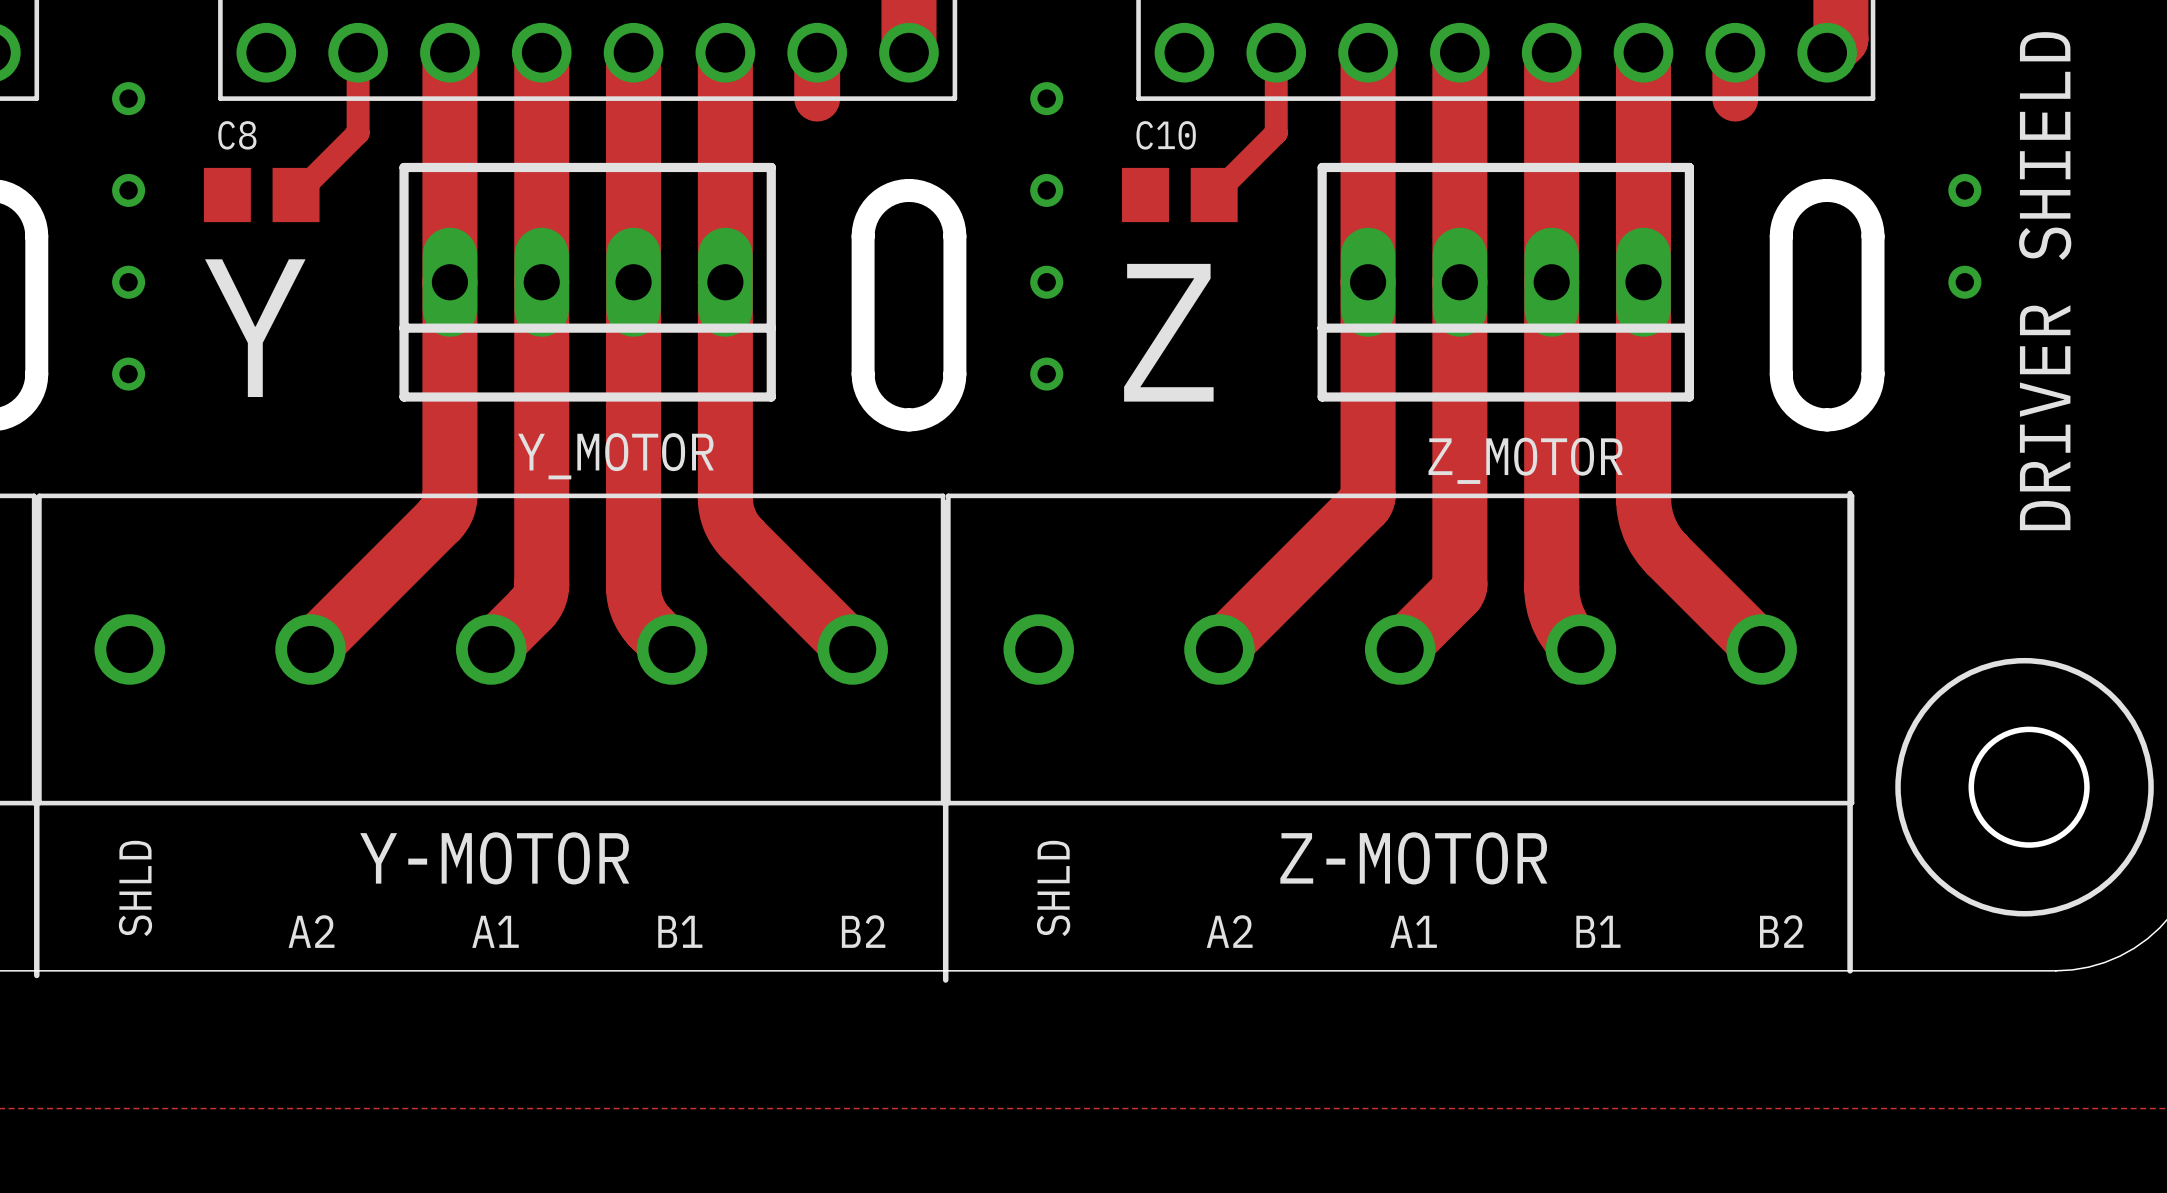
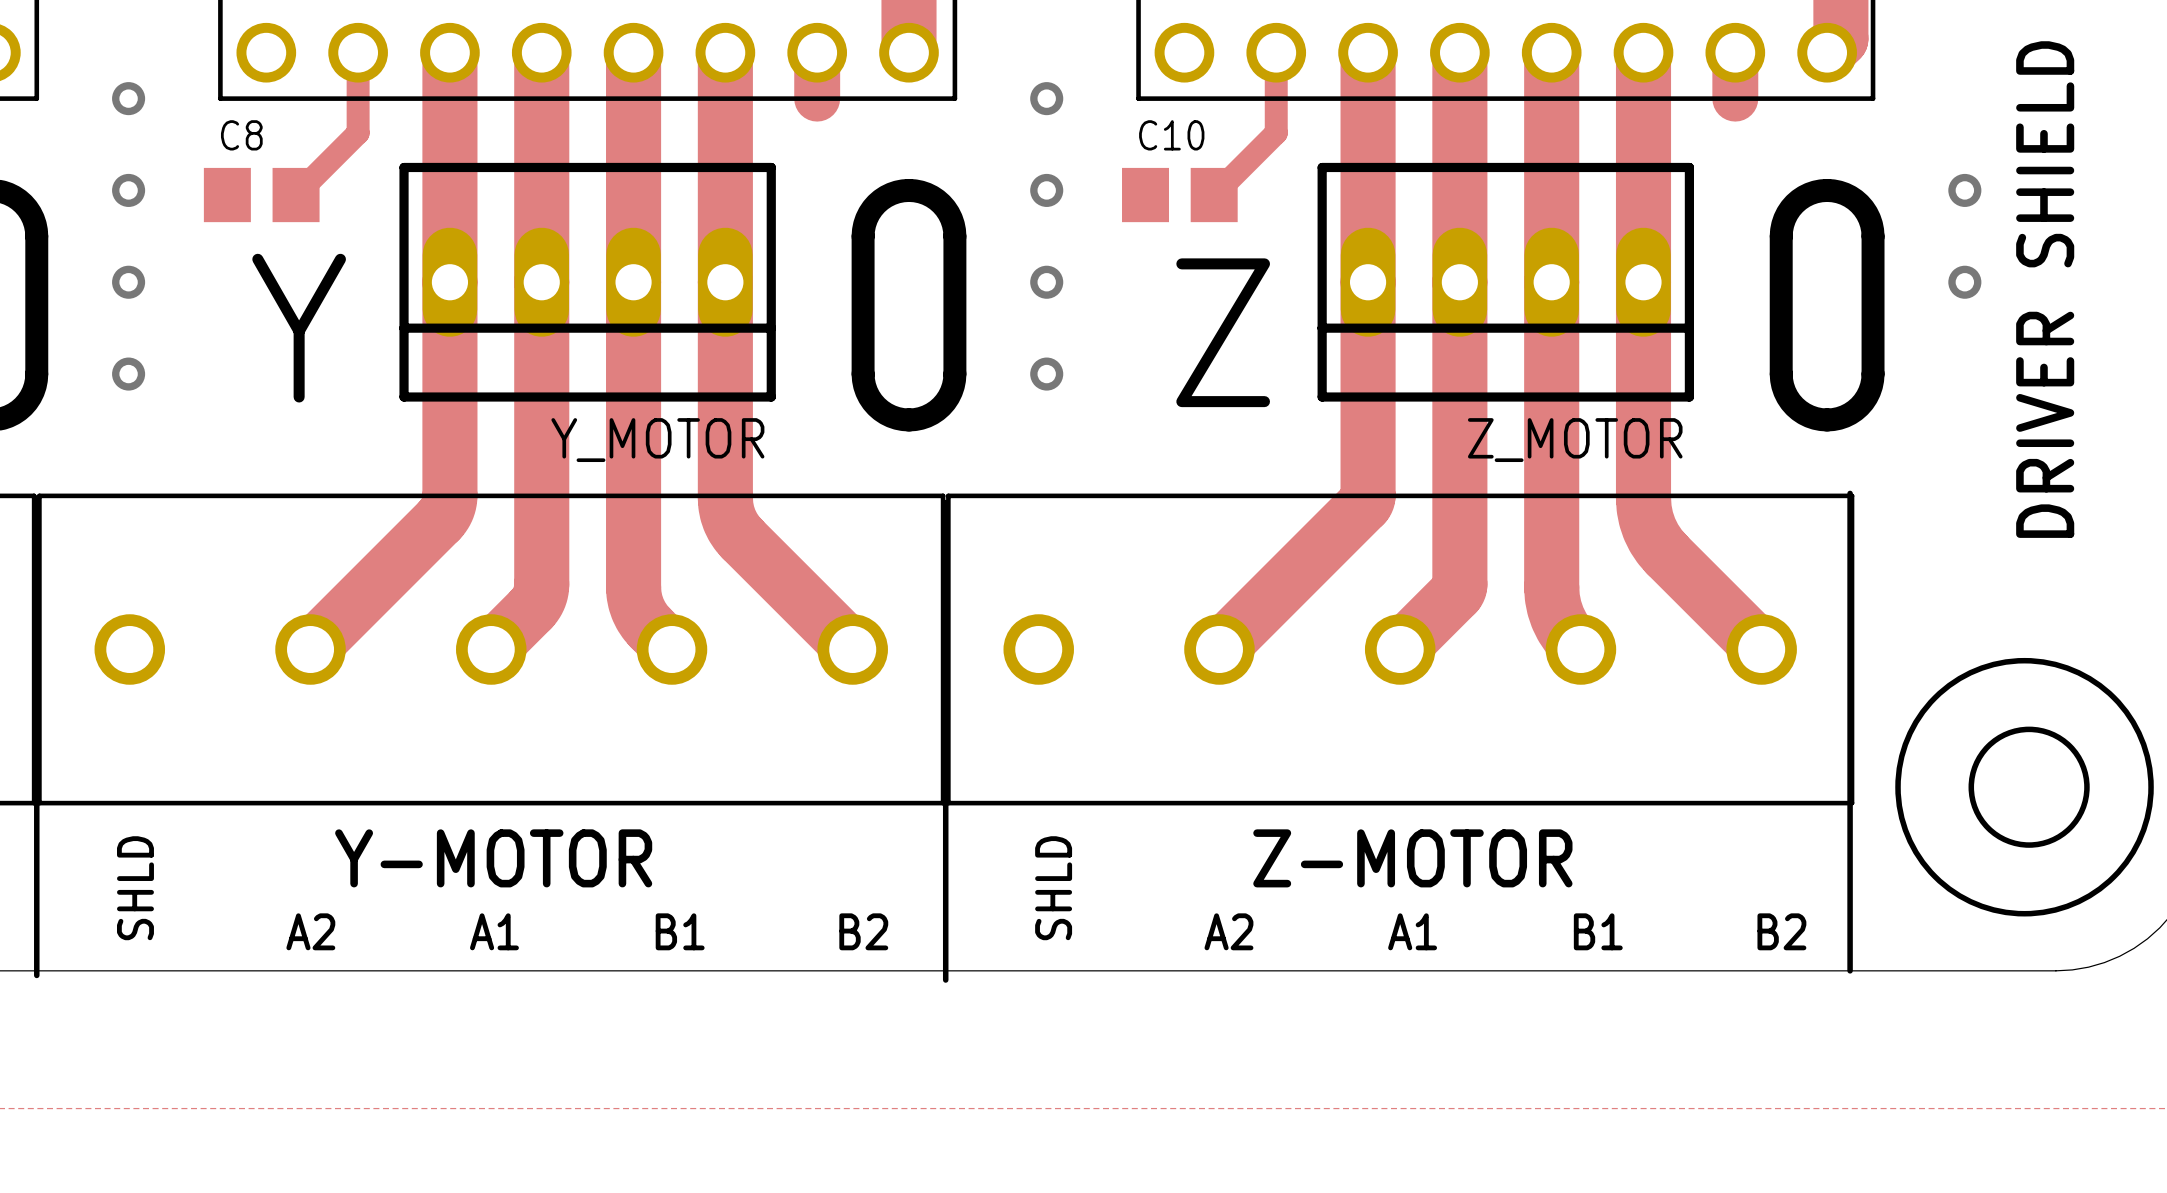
Y name position: Y (255, 328) -> Y (299, 328)
Z name position: Z (1168, 332) -> Z (1223, 332)
Y_MOTOR name position: Y_MOTOR (615, 456) -> Y_MOTOR (657, 440)
Z_MOTOR name position: Z_MOTOR (1525, 460) -> Z_MOTOR (1575, 440)

